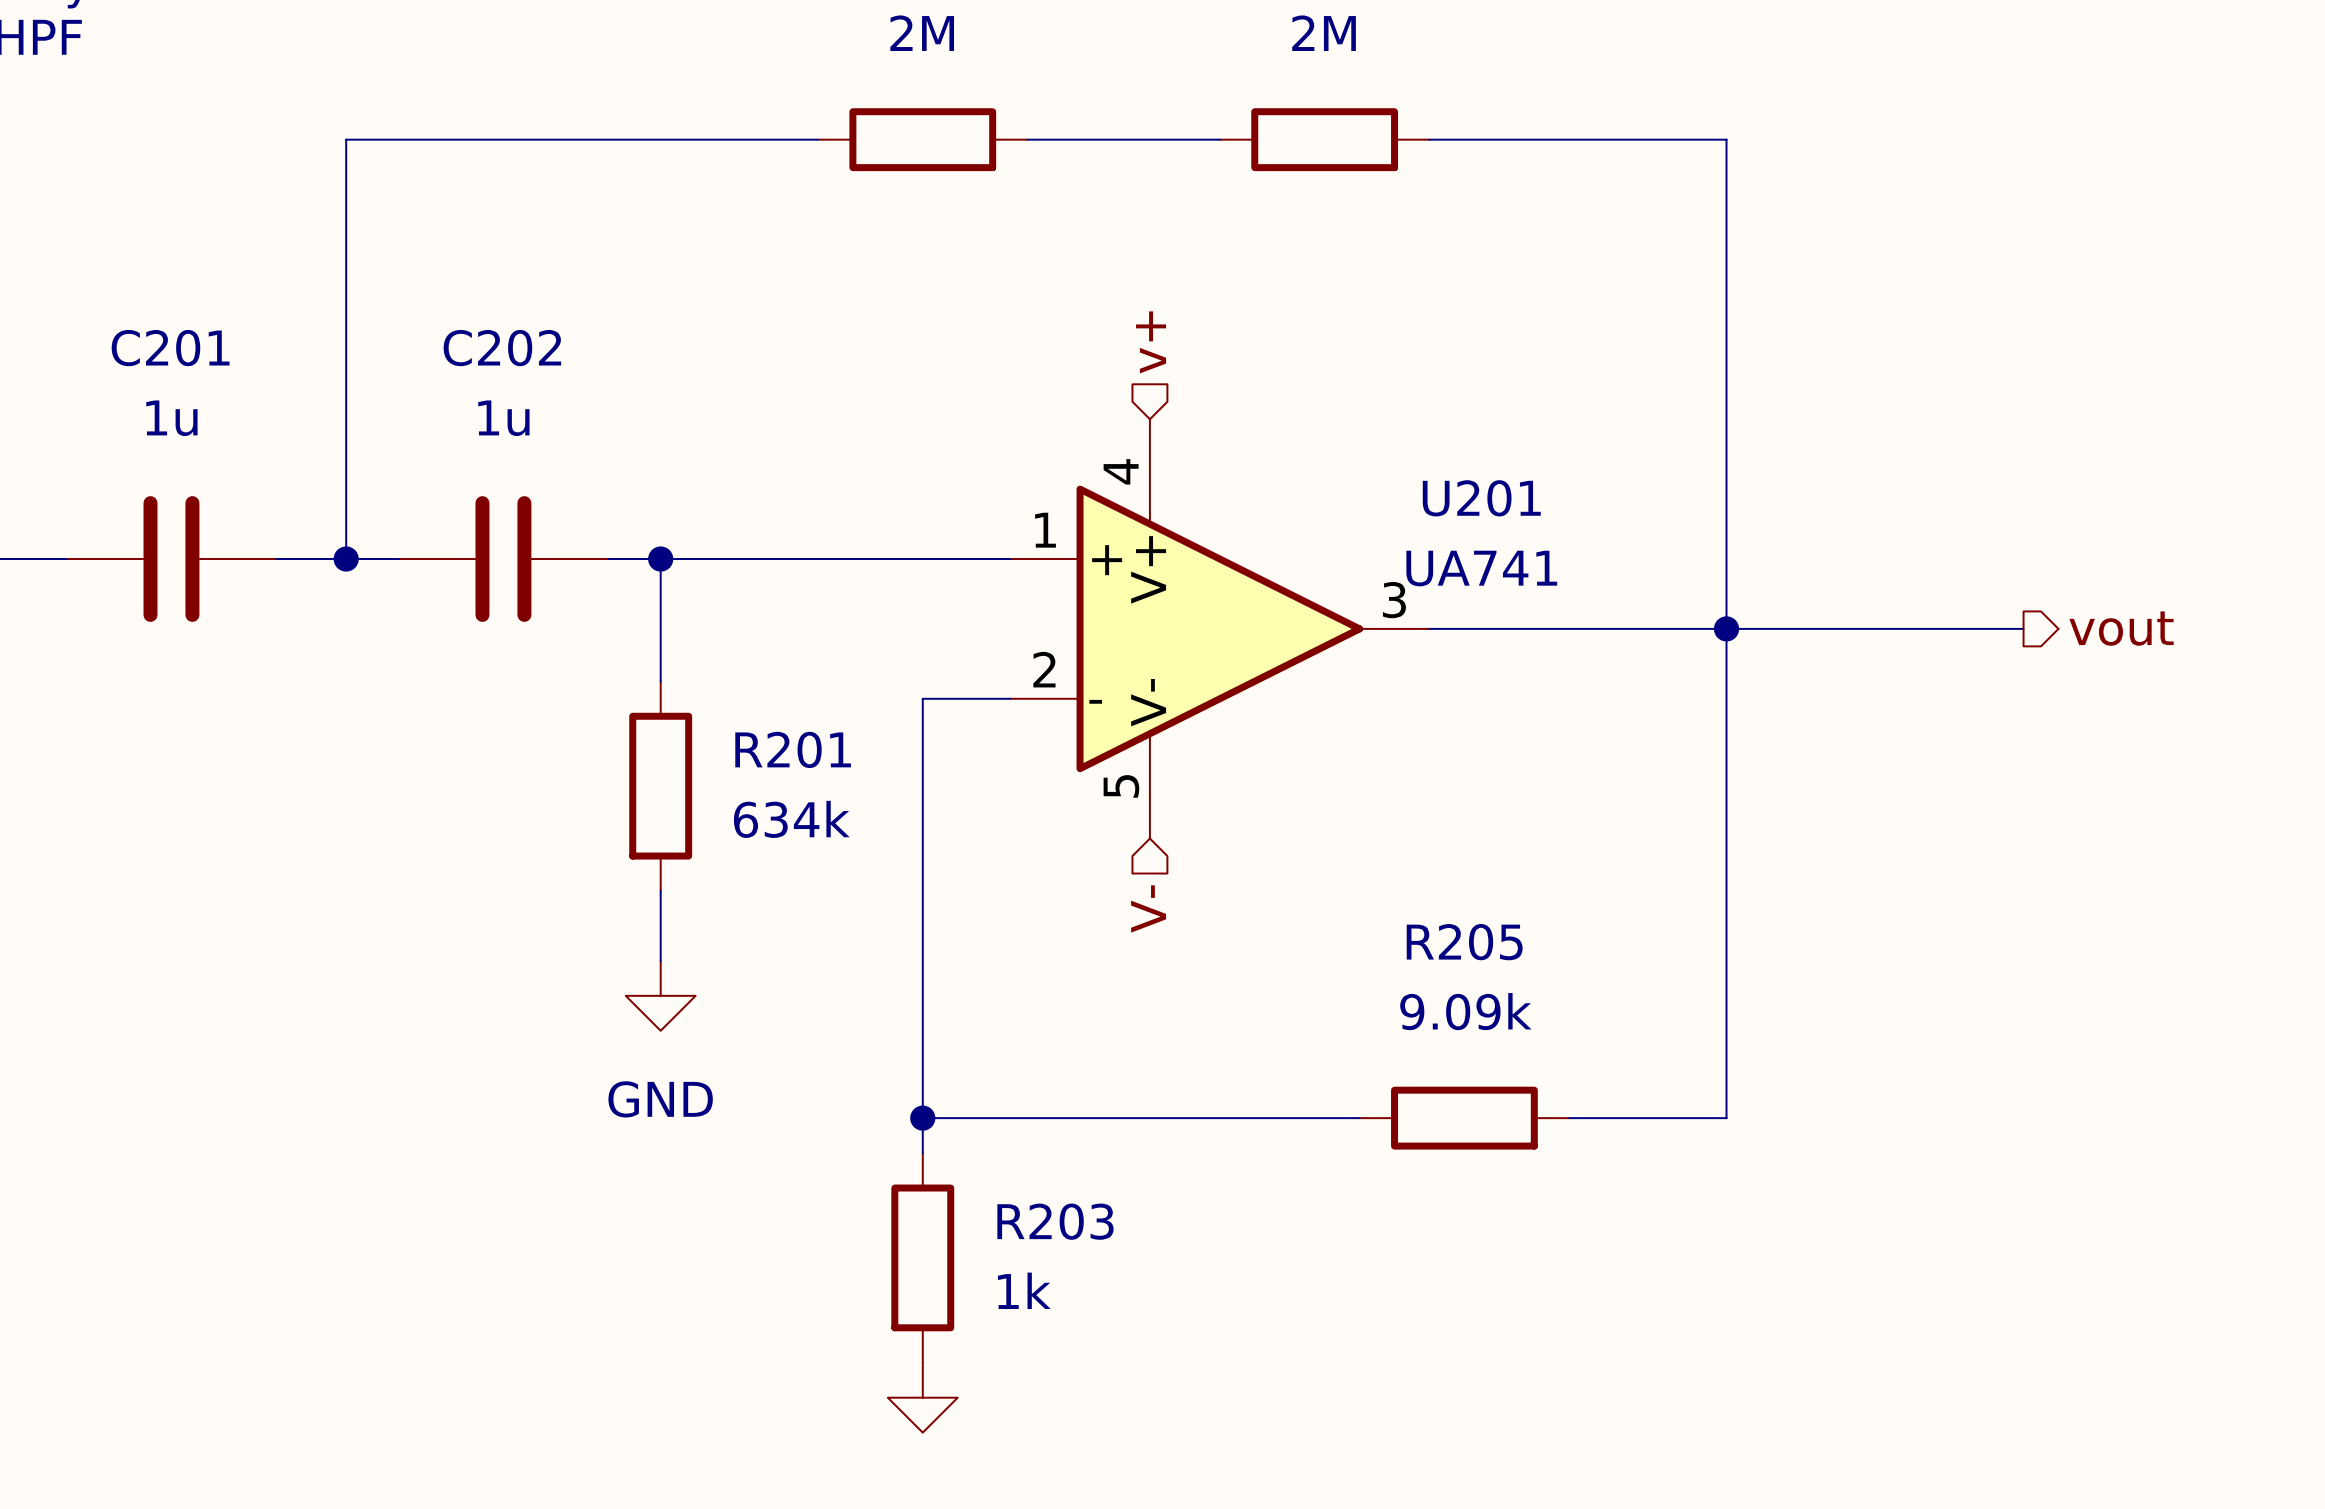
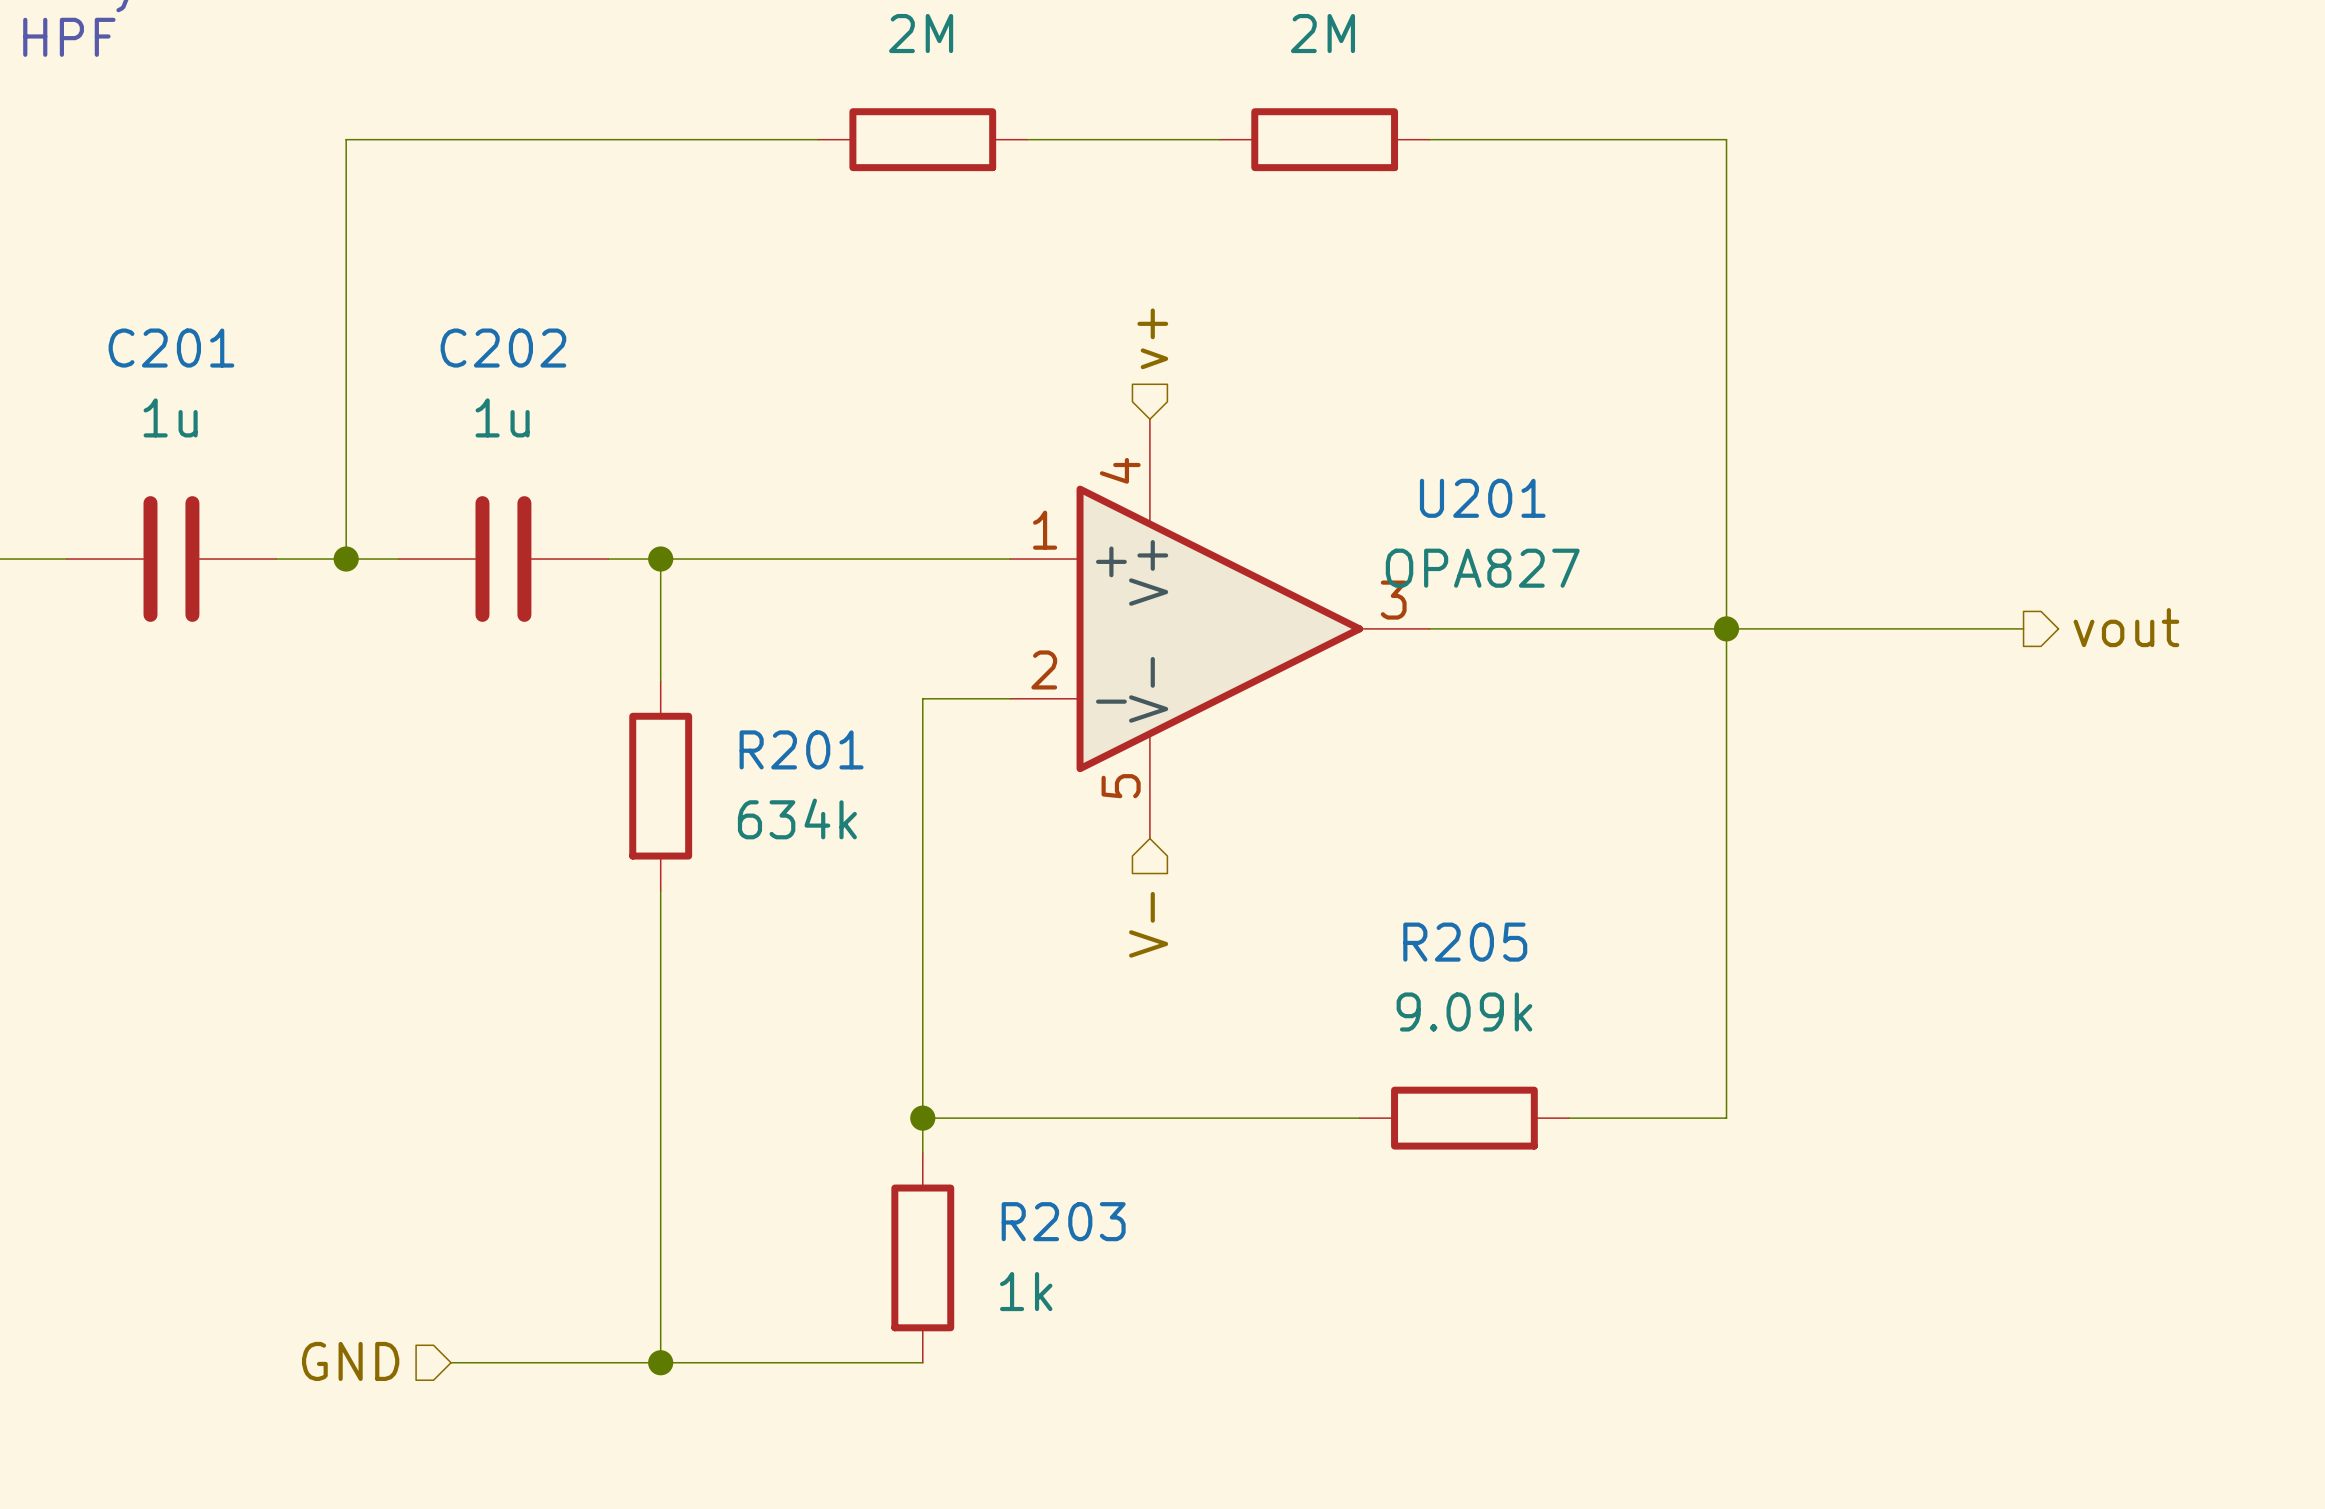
U201 value: UA741 (1481, 568) -> OPA827 (1482, 568)
wire: none -> (660, 960) (660, 1362)
power symbol: GND (660, 995) -> none
hierarchical label: none -> GND (350, 1361)
wire: none -> (451, 1362) (922, 1362)
junction: none -> (660, 1362)
power symbol: (922, 1397) -> none

